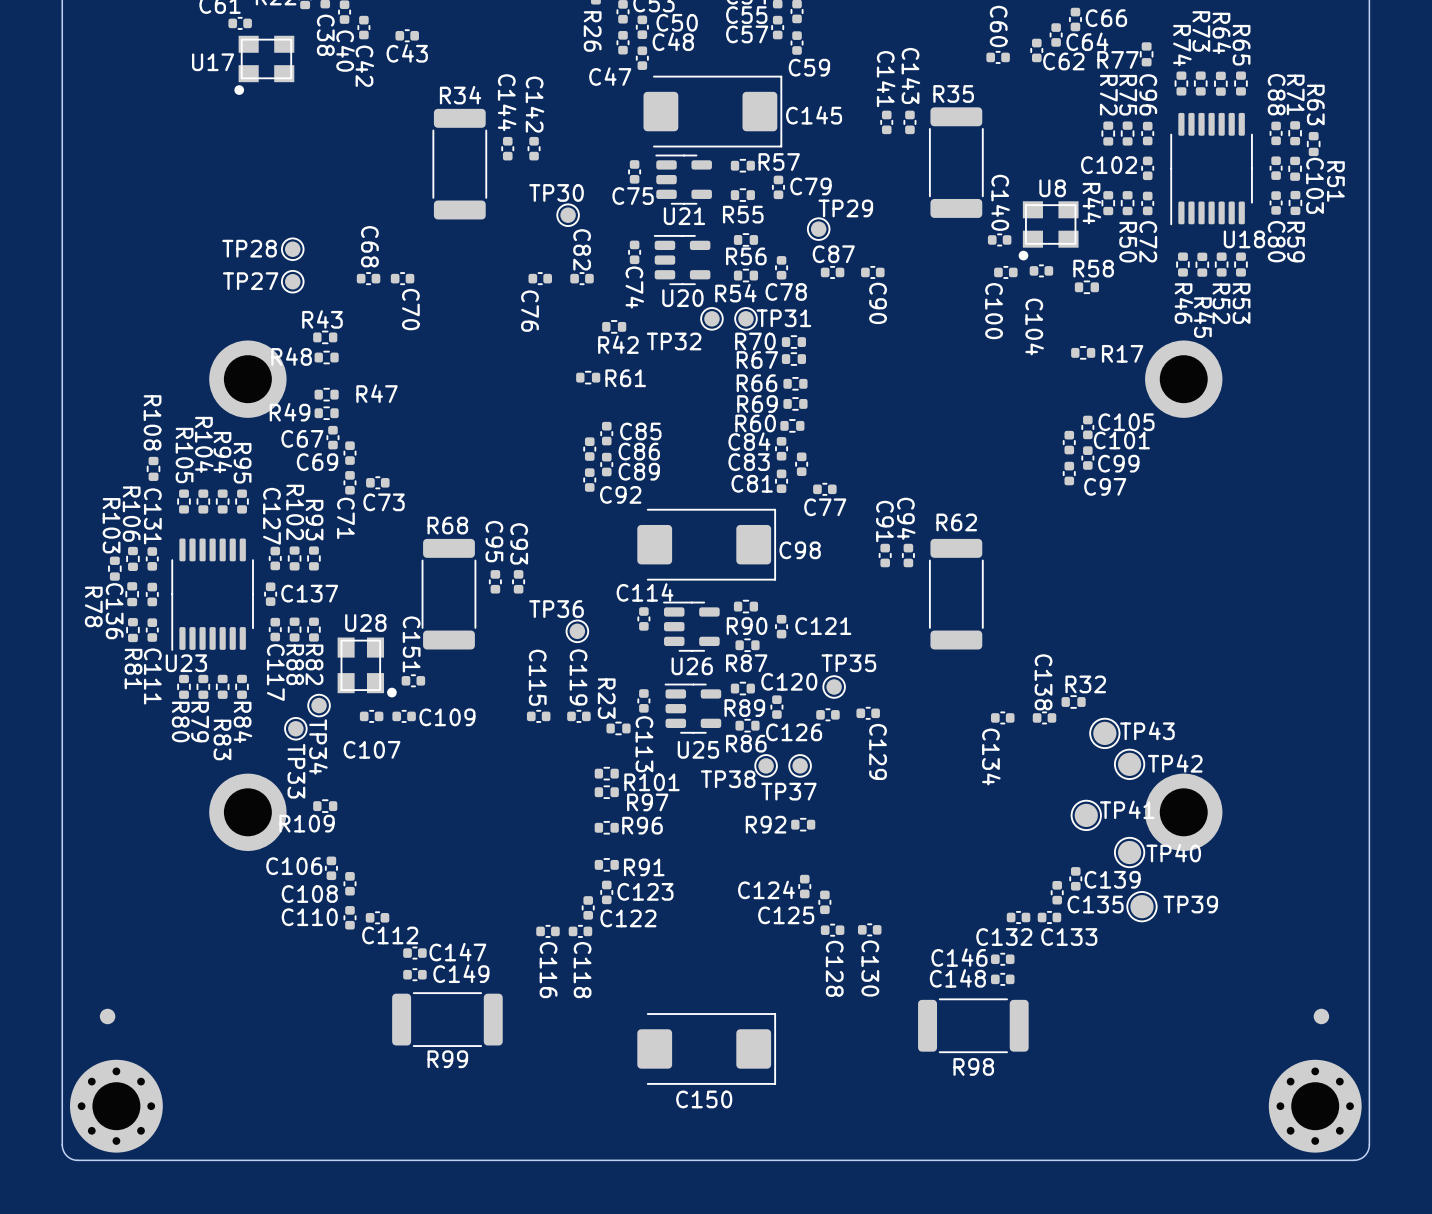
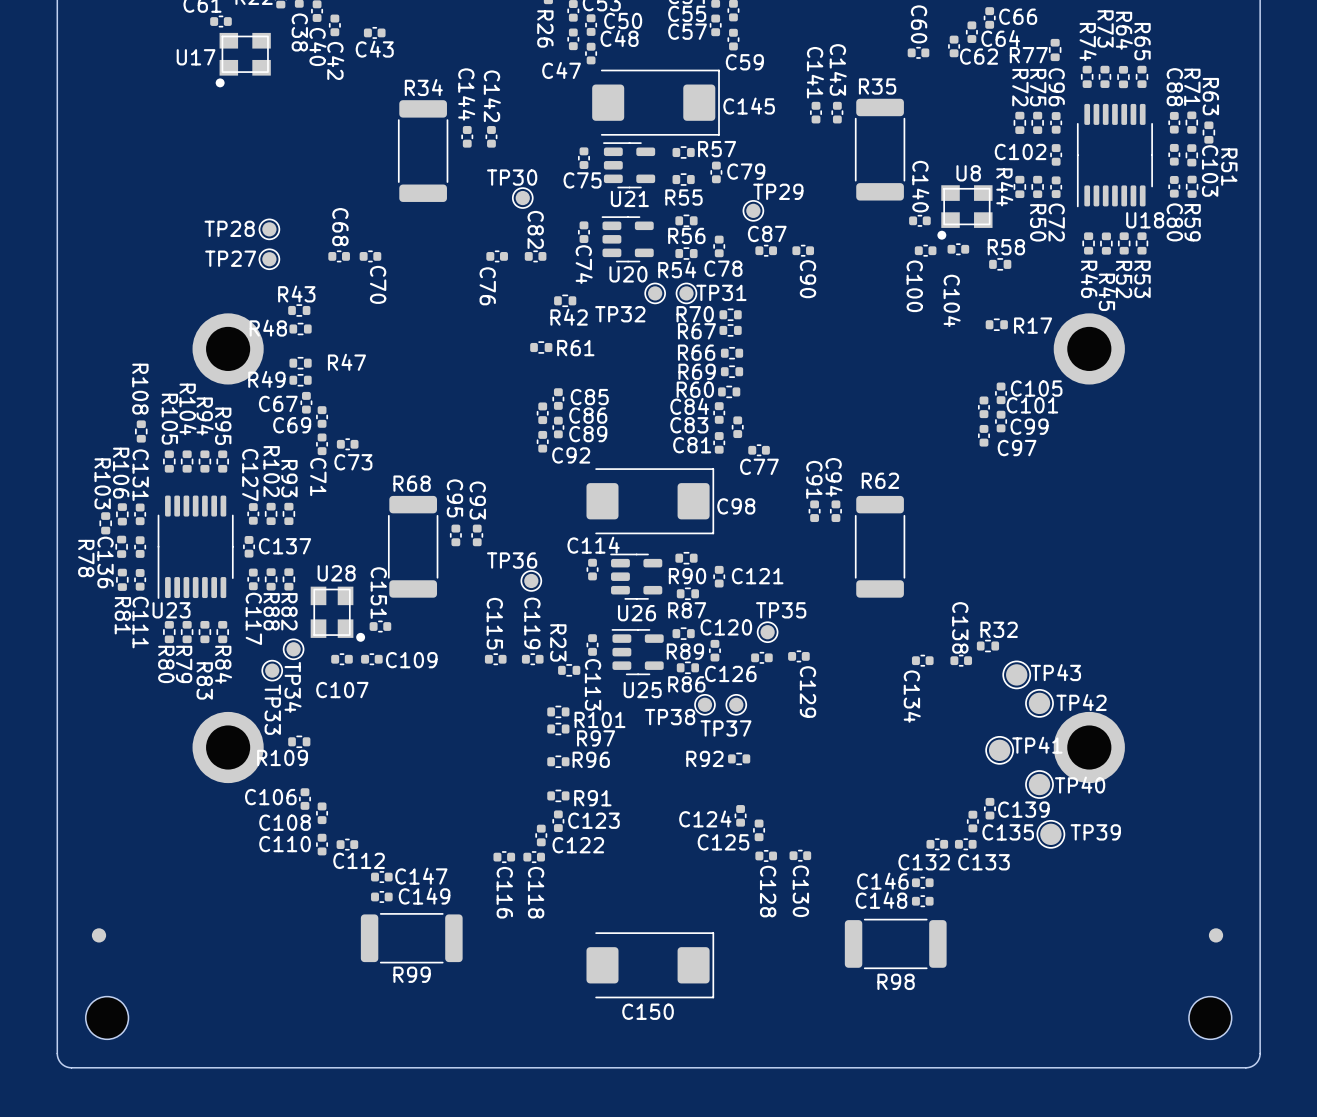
part footprint: [70, 1059, 163, 1153] -> [85, 996, 129, 1040]
part footprint: [1268, 1059, 1362, 1153] -> [1188, 996, 1232, 1040]

